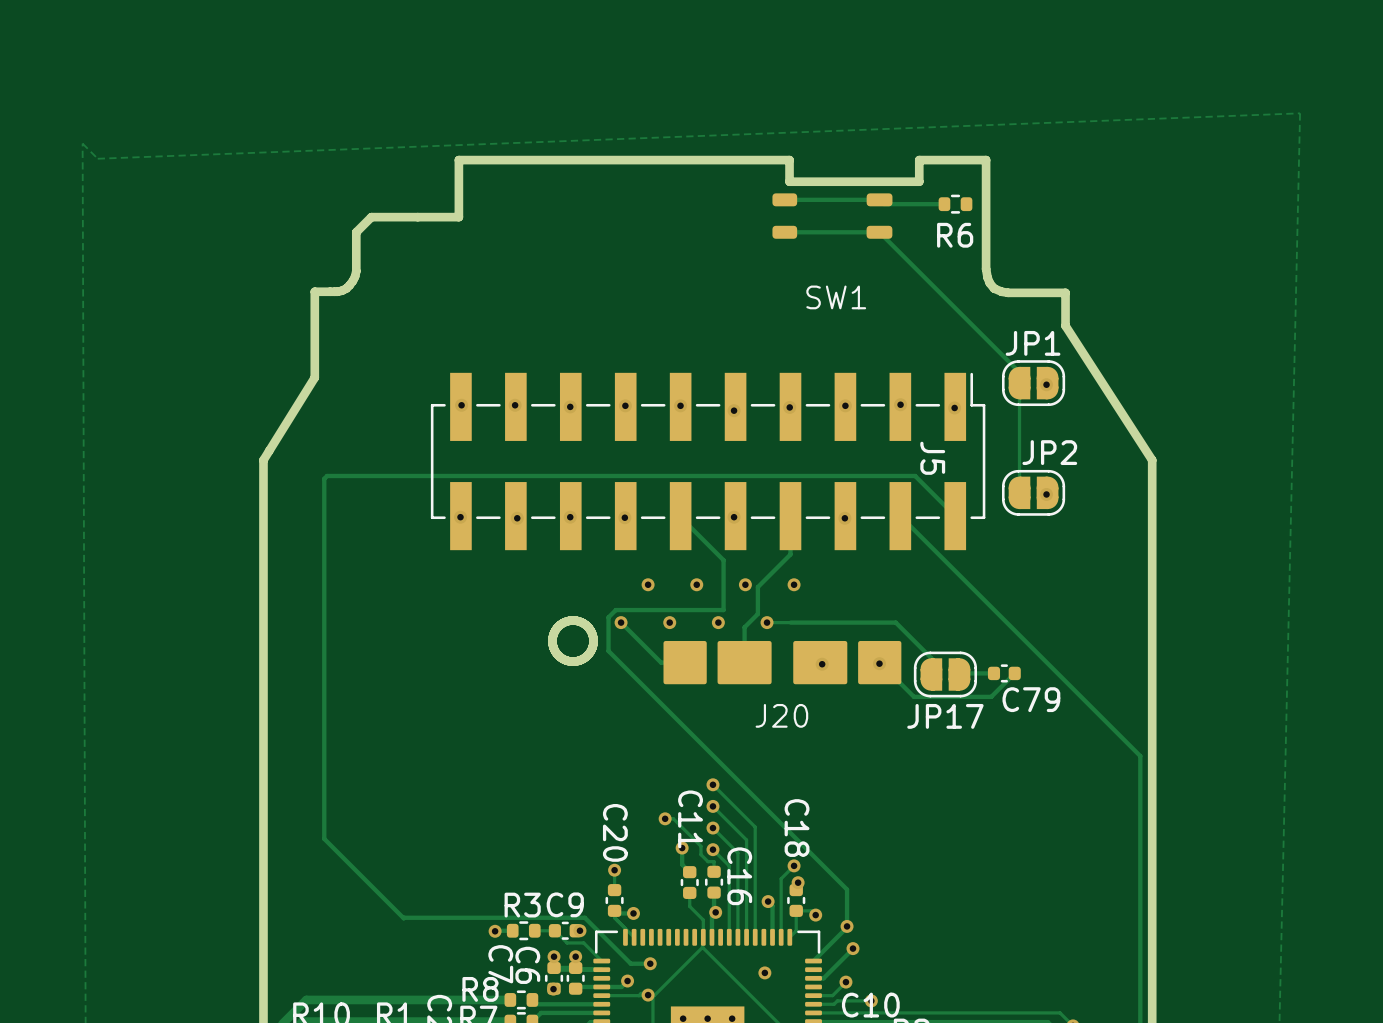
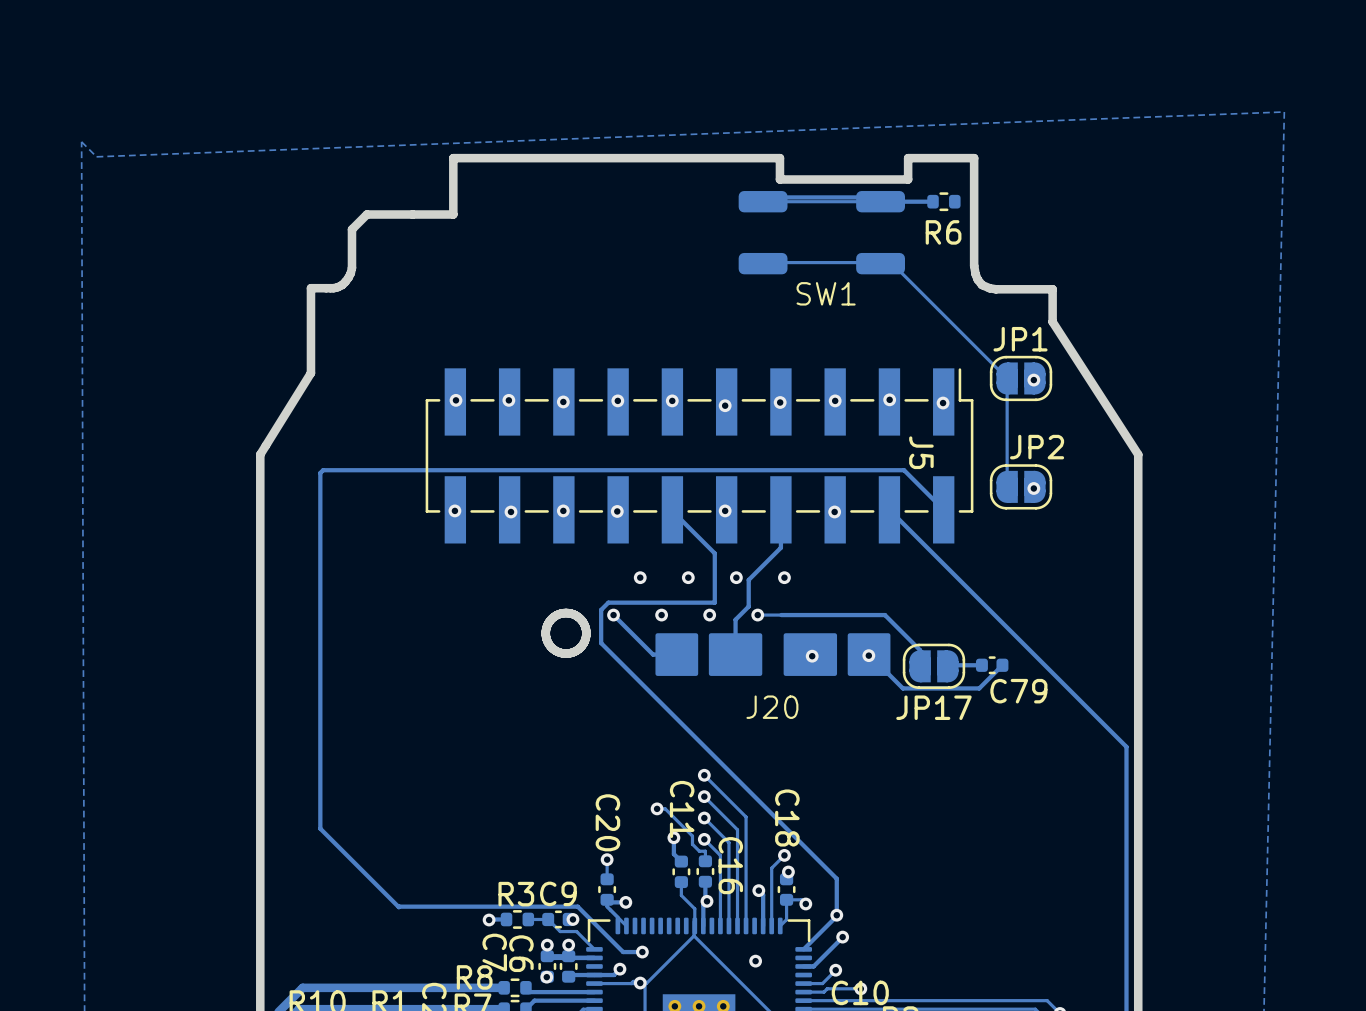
SW1 footprint: [772, 193, 893, 239] -> [738, 191, 905, 275]
track: none -> (873, 201) (763, 201)
track: (784, 232) (879, 232) (1019, 372) -> none
track: none -> (880, 262) (763, 262)
track: none -> (892, 263) (1007, 378)

